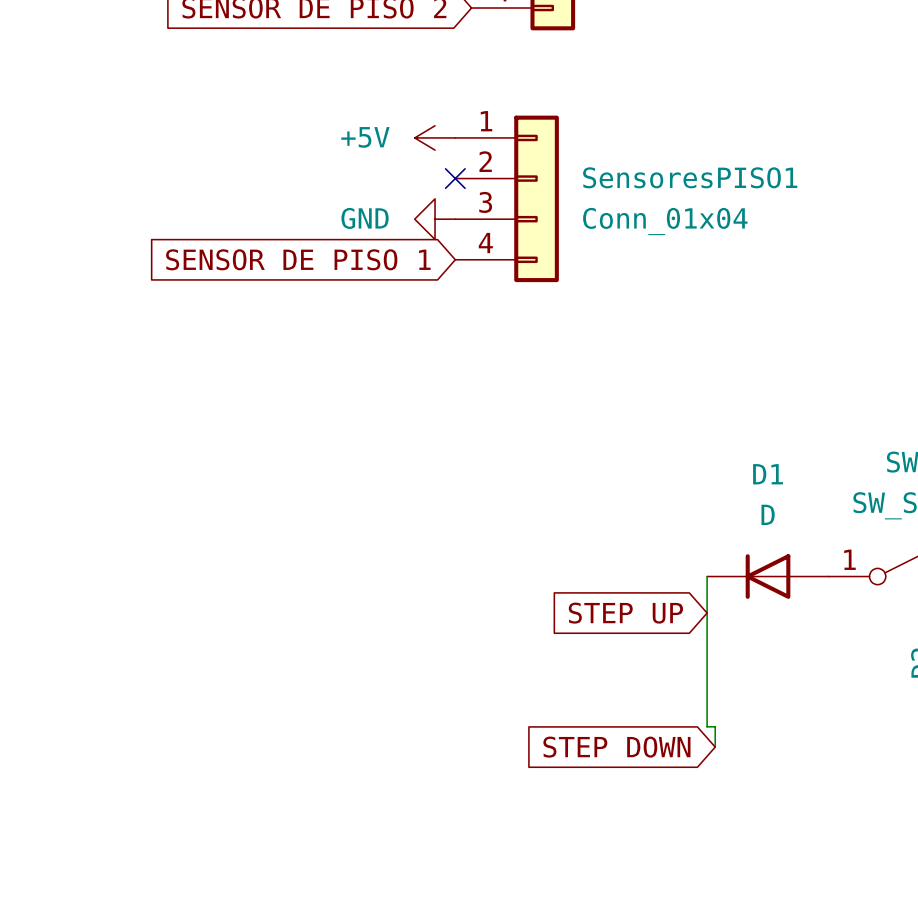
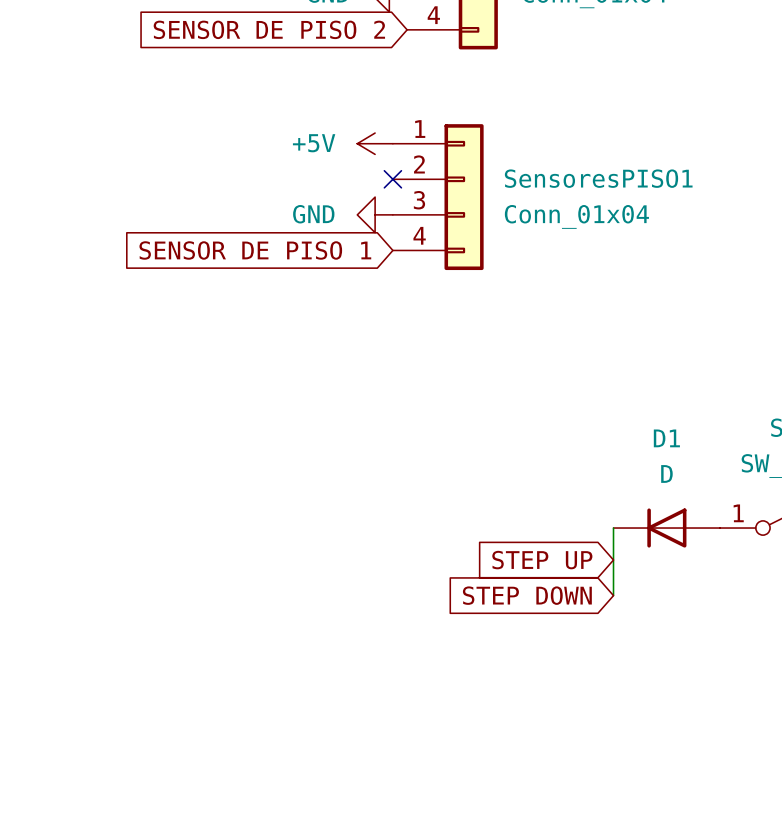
wire: (707, 653) (707, 726) (715, 726) (715, 747) -> none
global label position: STEP DOWN (616, 747) -> STEP DOWN (527, 595)

